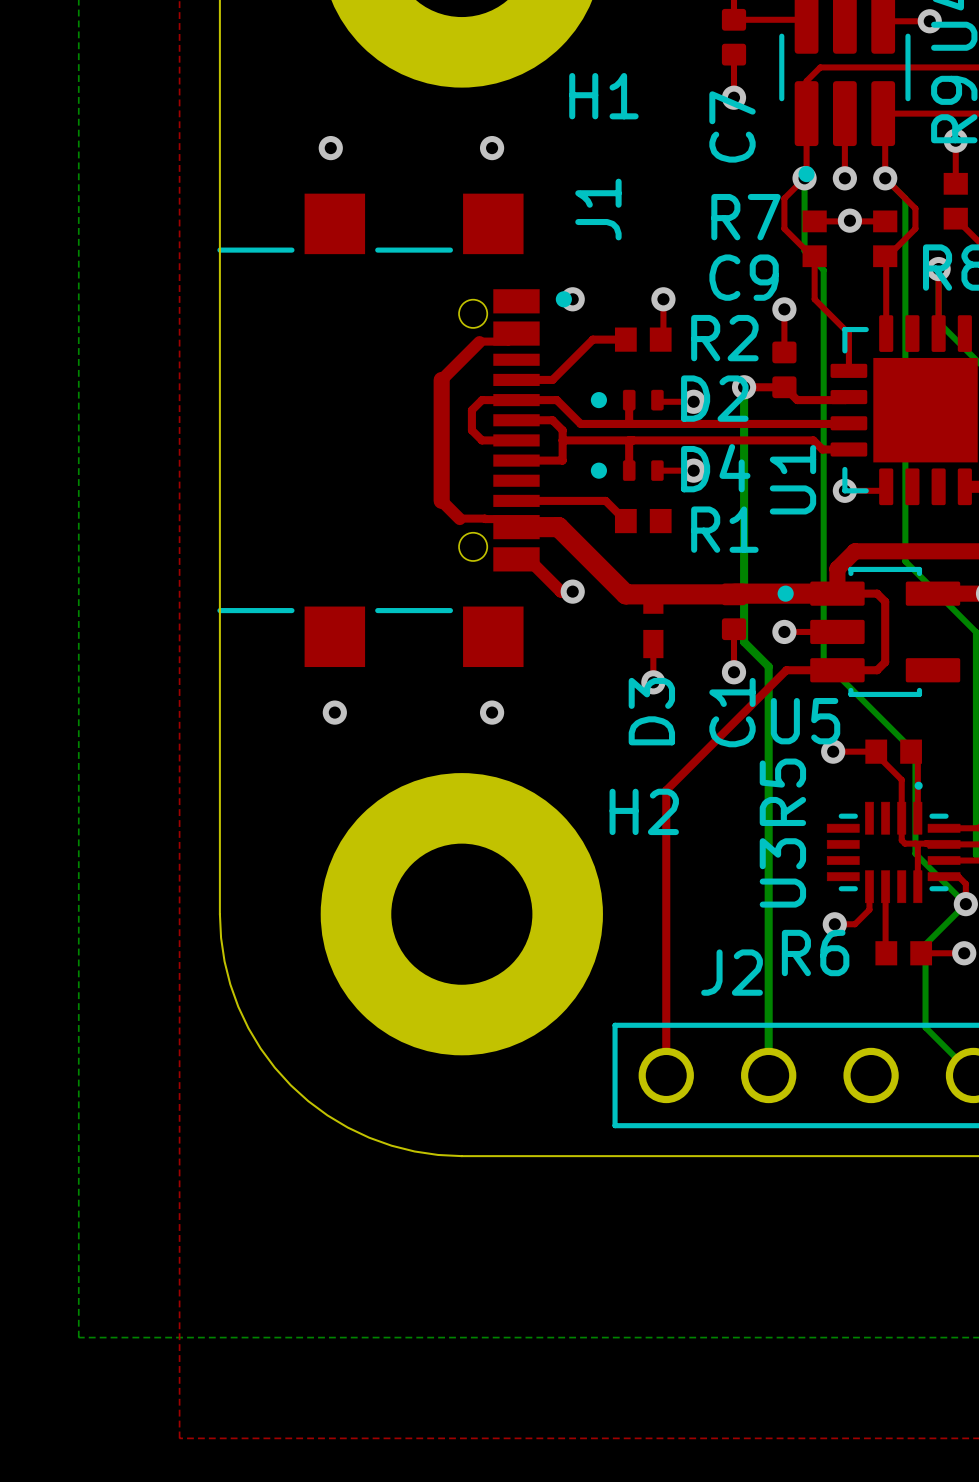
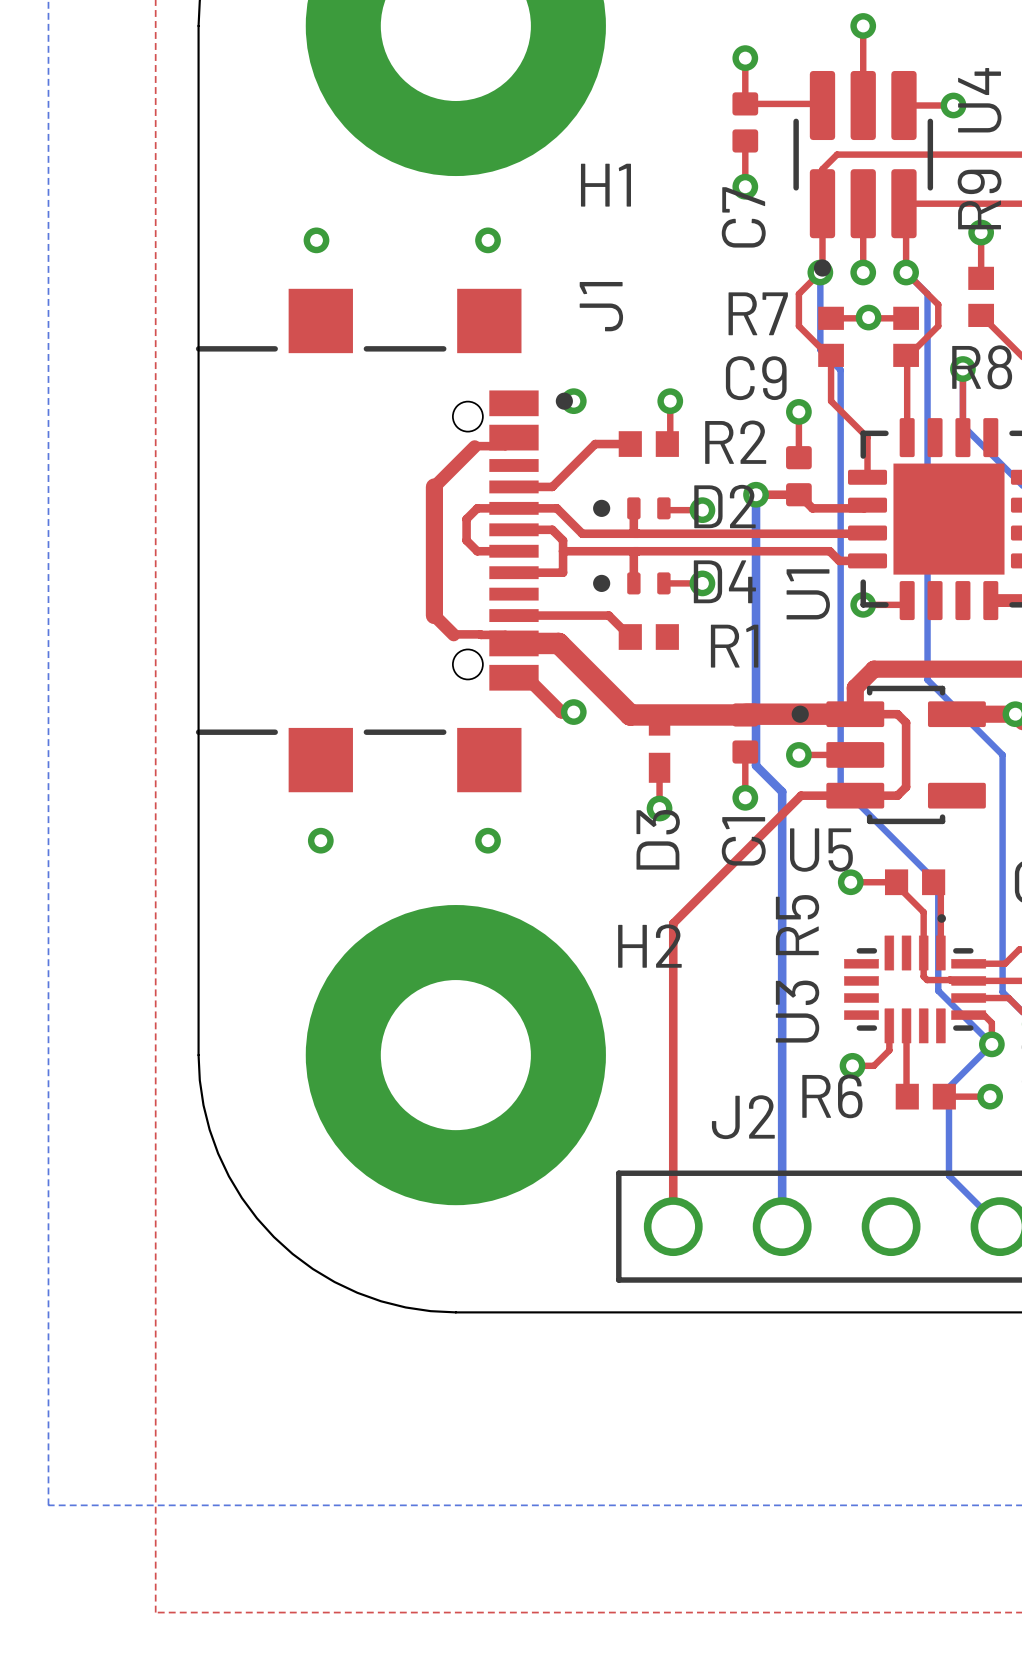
top track: (915, 843) (917, 846) (917, 886) -> none

